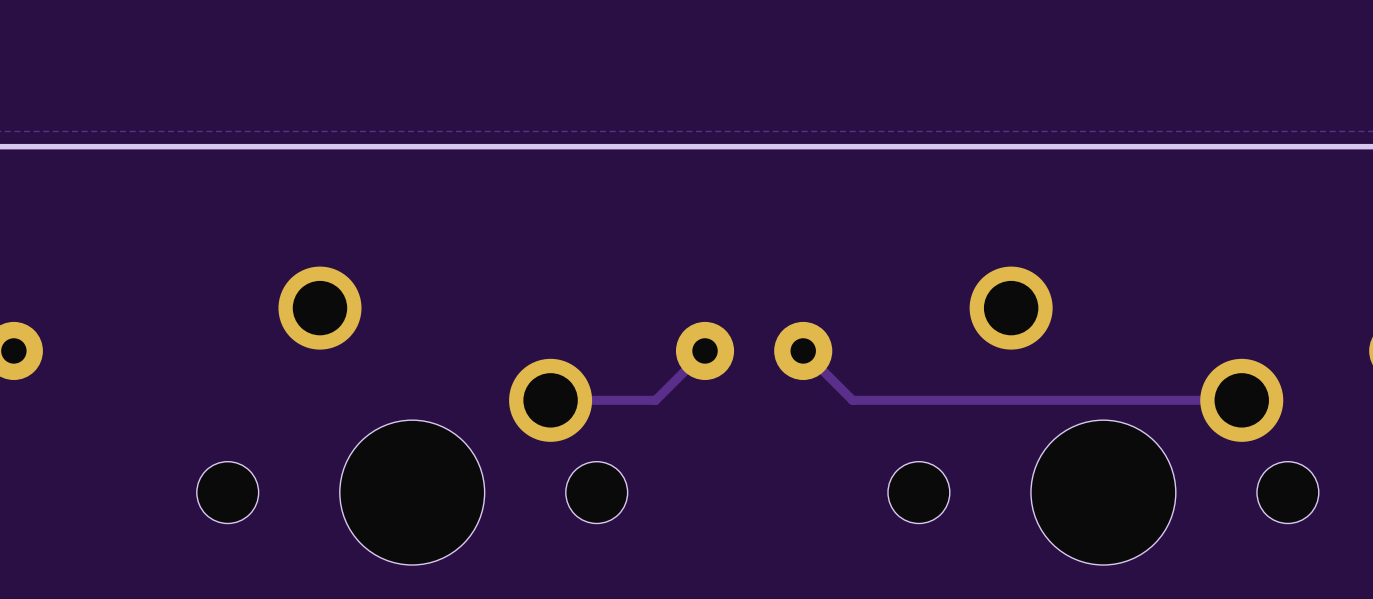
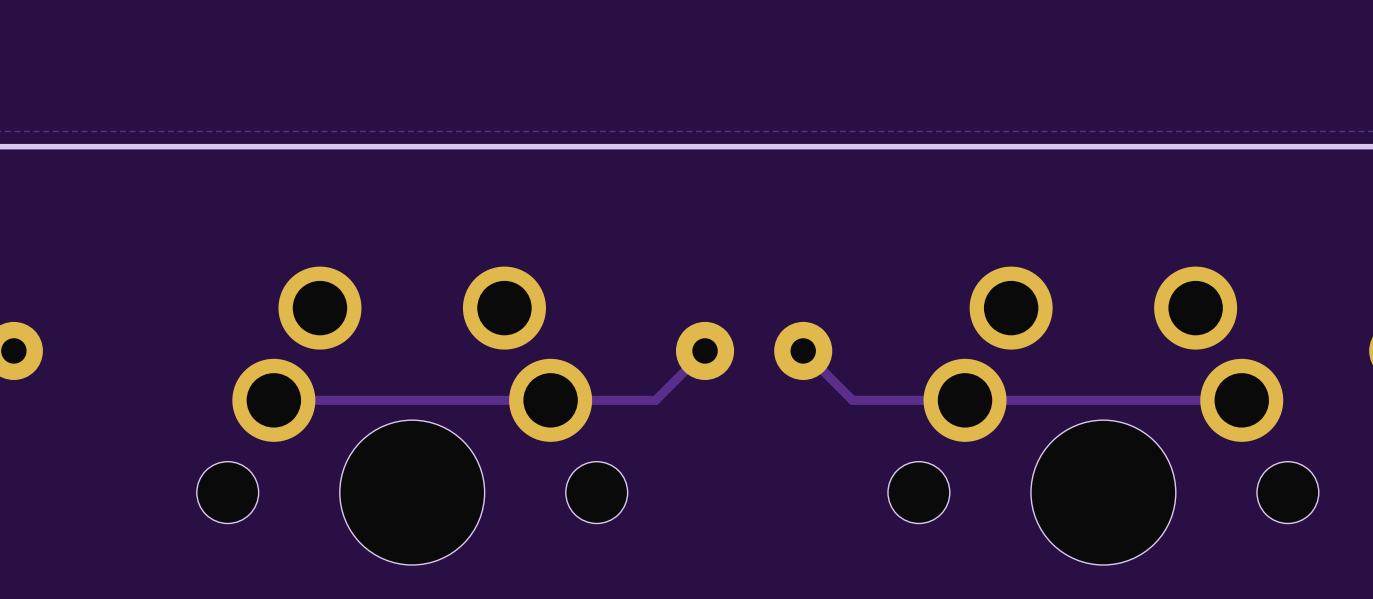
part footprint: [196, 266, 628, 566] -> [196, 266, 628, 566]
part footprint: [887, 266, 1319, 566] -> [887, 266, 1319, 566]
track: none -> (550, 400) (273, 400)

